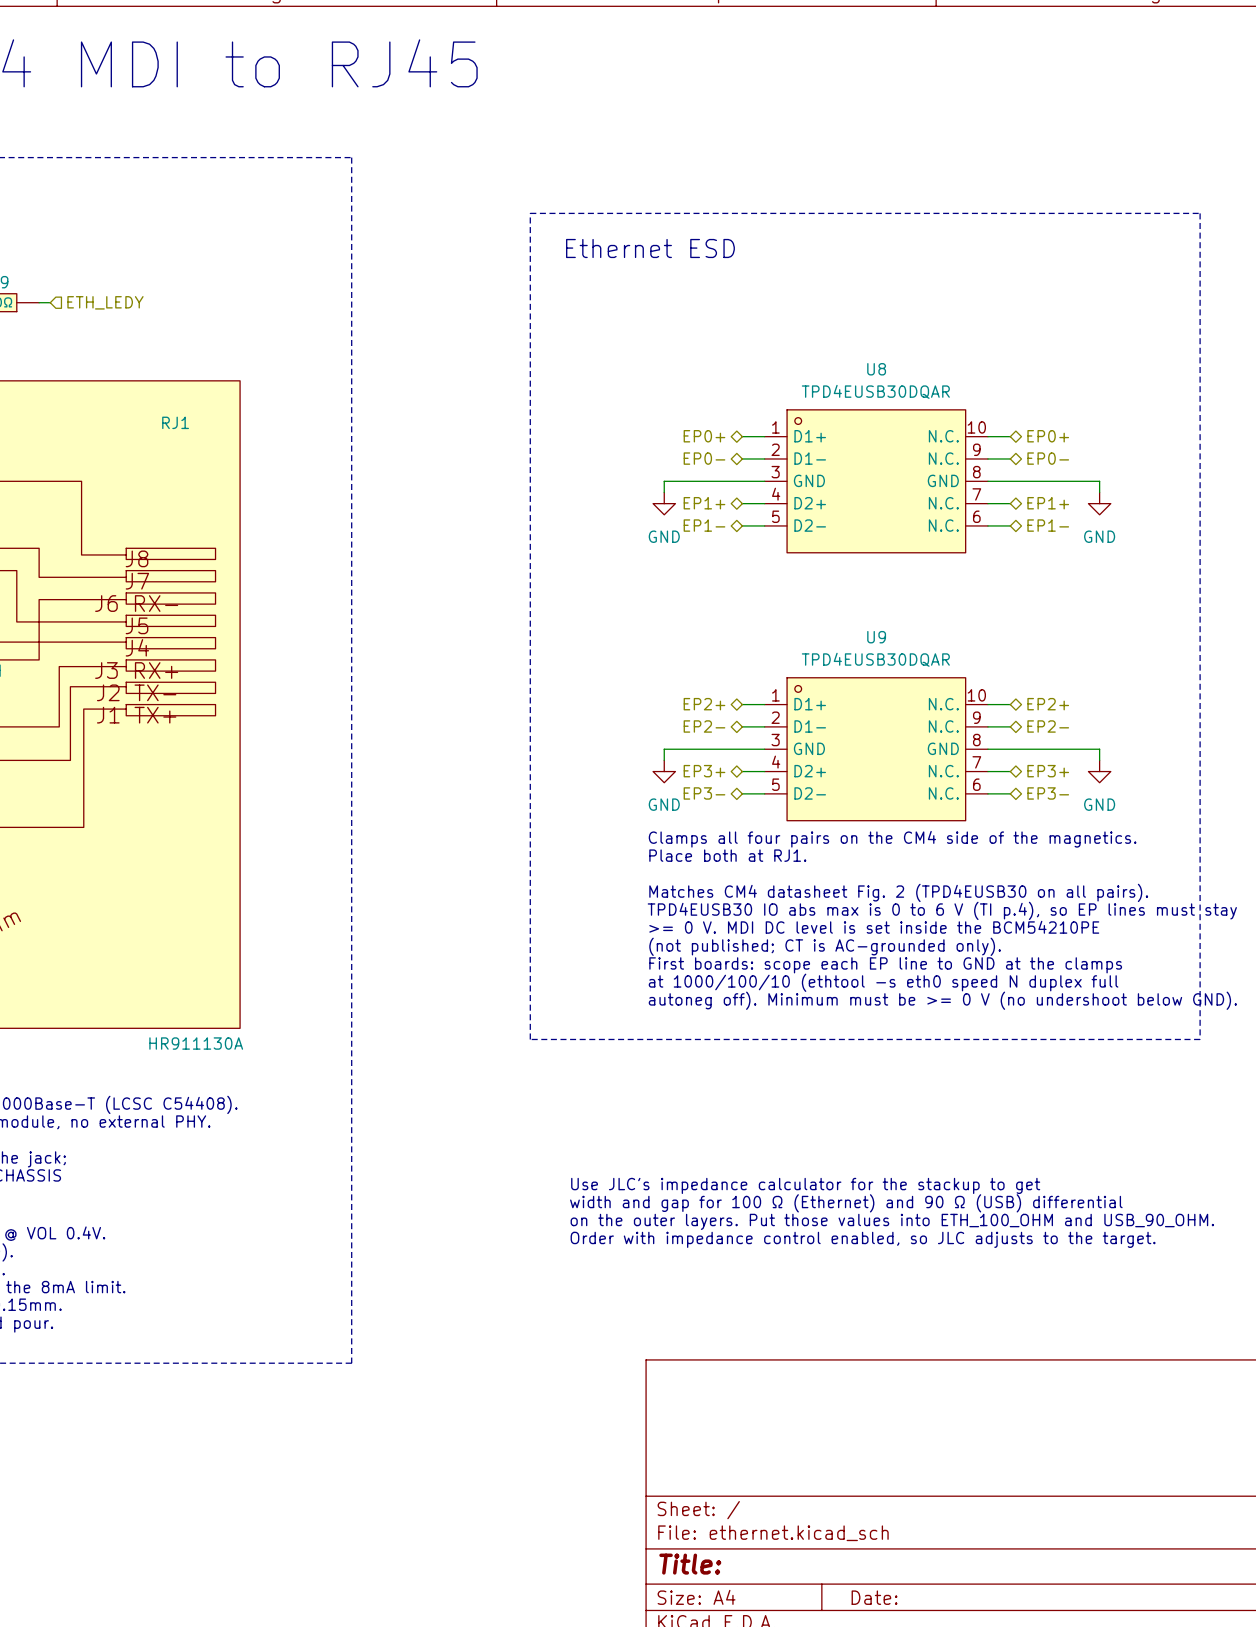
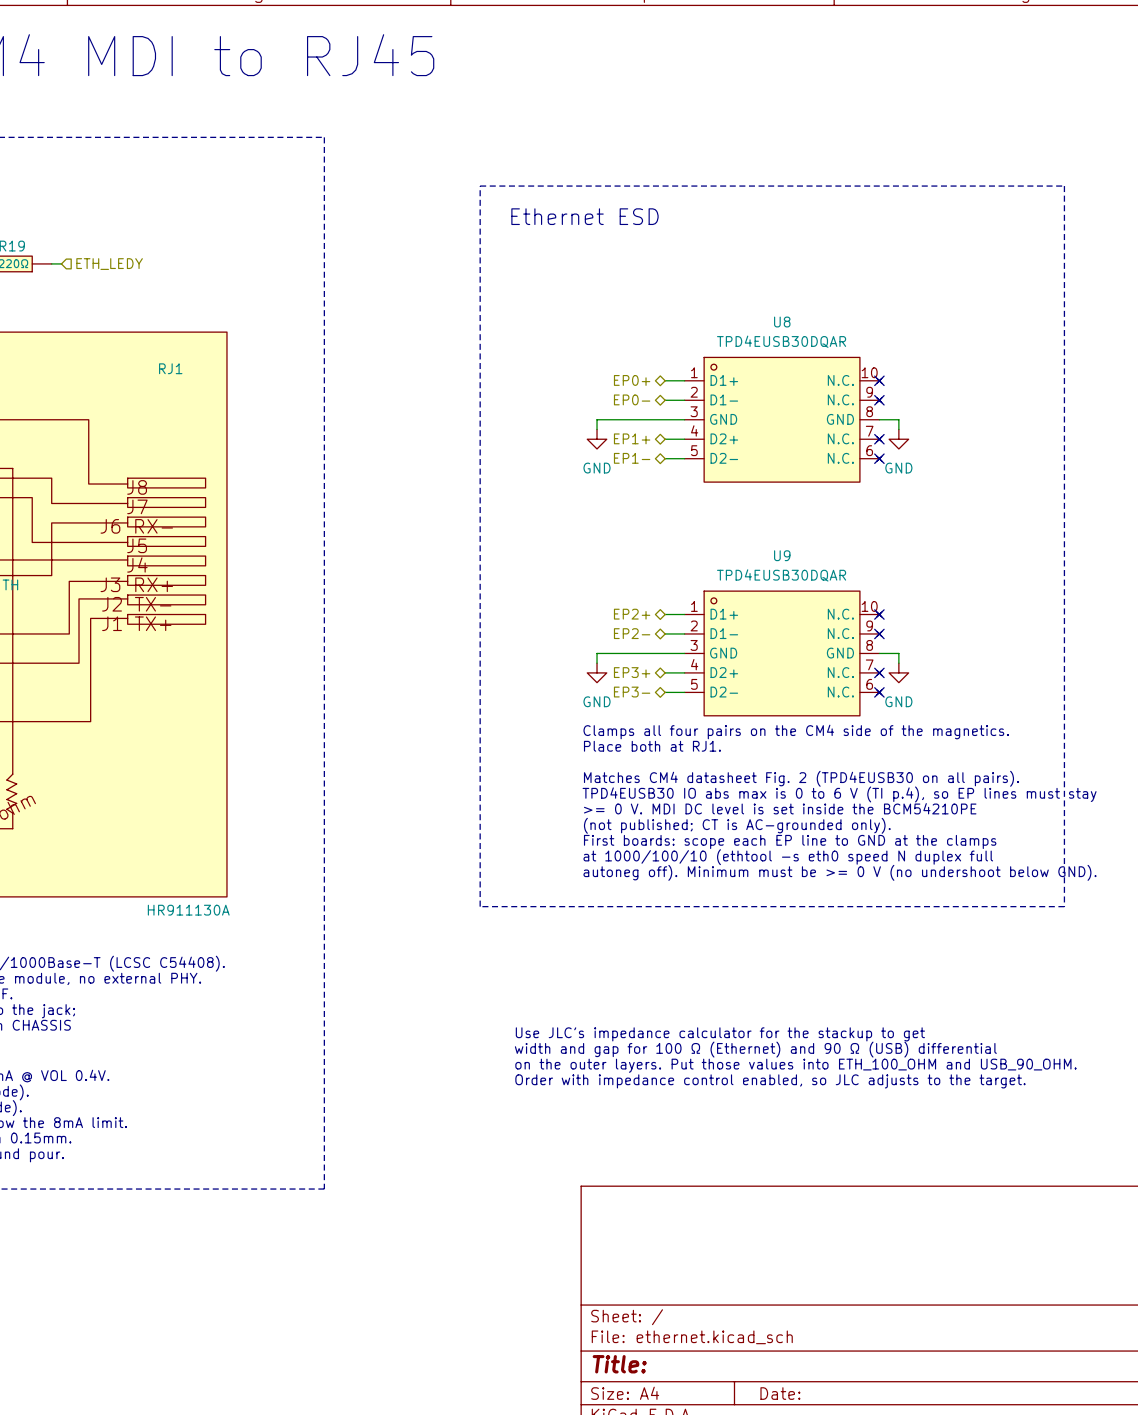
U8 symbol: [764, 409, 988, 553] -> [684, 357, 882, 483]
wire: (987, 436) (1010, 436) -> none
no-connect mark: none -> (879, 380)
hierarchical label: EP0+ (1048, 436) -> none
wire: (987, 458) (1010, 458) -> none
no-connect mark: none -> (879, 400)
hierarchical label: EP0- (1048, 458) -> none
wire: (1010, 481) (1099, 481) (1099, 492) -> (898, 419) (898, 429)
no-connect mark: none -> (879, 439)
hierarchical label: EP1+ (1048, 503) -> none
power symbol position: GND (1099, 503) -> GND (898, 439)
wire: (987, 525) (1010, 525) -> none
no-connect mark: none -> (879, 458)
hierarchical label: EP1- (1048, 525) -> none
U9 symbol: [764, 677, 988, 821] -> [684, 591, 882, 716]
wire: (987, 704) (1010, 704) -> none
no-connect mark: none -> (879, 614)
hierarchical label: EP2+ (1048, 704) -> none
wire: (987, 726) (1010, 726) -> none
no-connect mark: none -> (879, 633)
hierarchical label: EP2- (1048, 726) -> none
wire: (1010, 749) (1099, 749) (1099, 760) -> (898, 653) (898, 663)
no-connect mark: none -> (879, 672)
hierarchical label: EP3+ (1048, 771) -> none
power symbol position: GND (1099, 771) -> GND (898, 672)
wire: (987, 793) (1010, 793) -> none
no-connect mark: none -> (879, 692)
hierarchical label: EP3- (1048, 793) -> none

